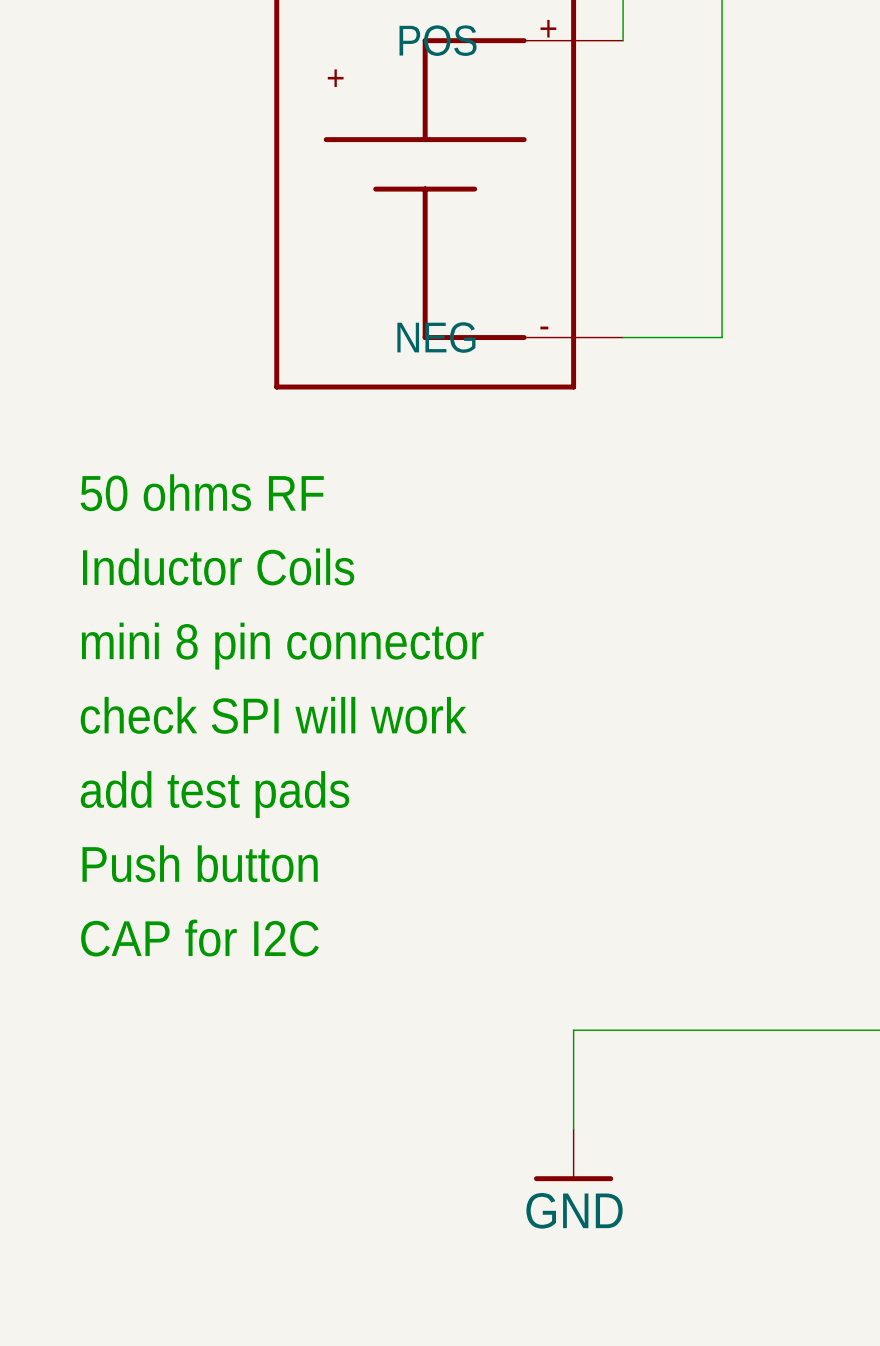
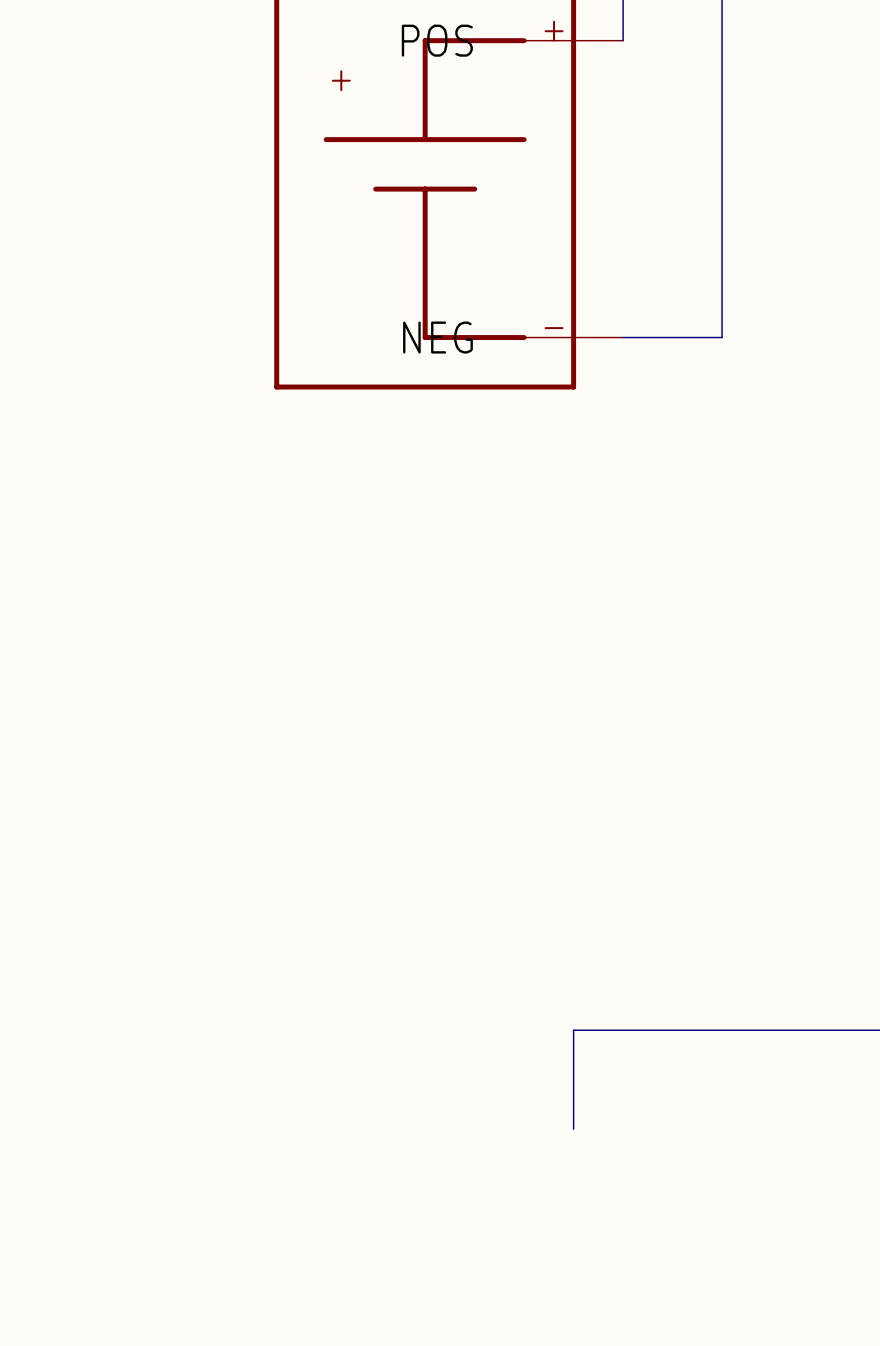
text: 50 ohms RF (202, 492) -> none
text: Inductor Coils (218, 566) -> none
text: mini 8 pin connector (282, 646) -> none
text: check SPI will work (273, 715) -> none
text: add test pads (214, 794) -> none
text: Push button (200, 863) -> none
text: CAP for I2C (199, 938) -> none
power symbol: GND (573, 1155) -> none

